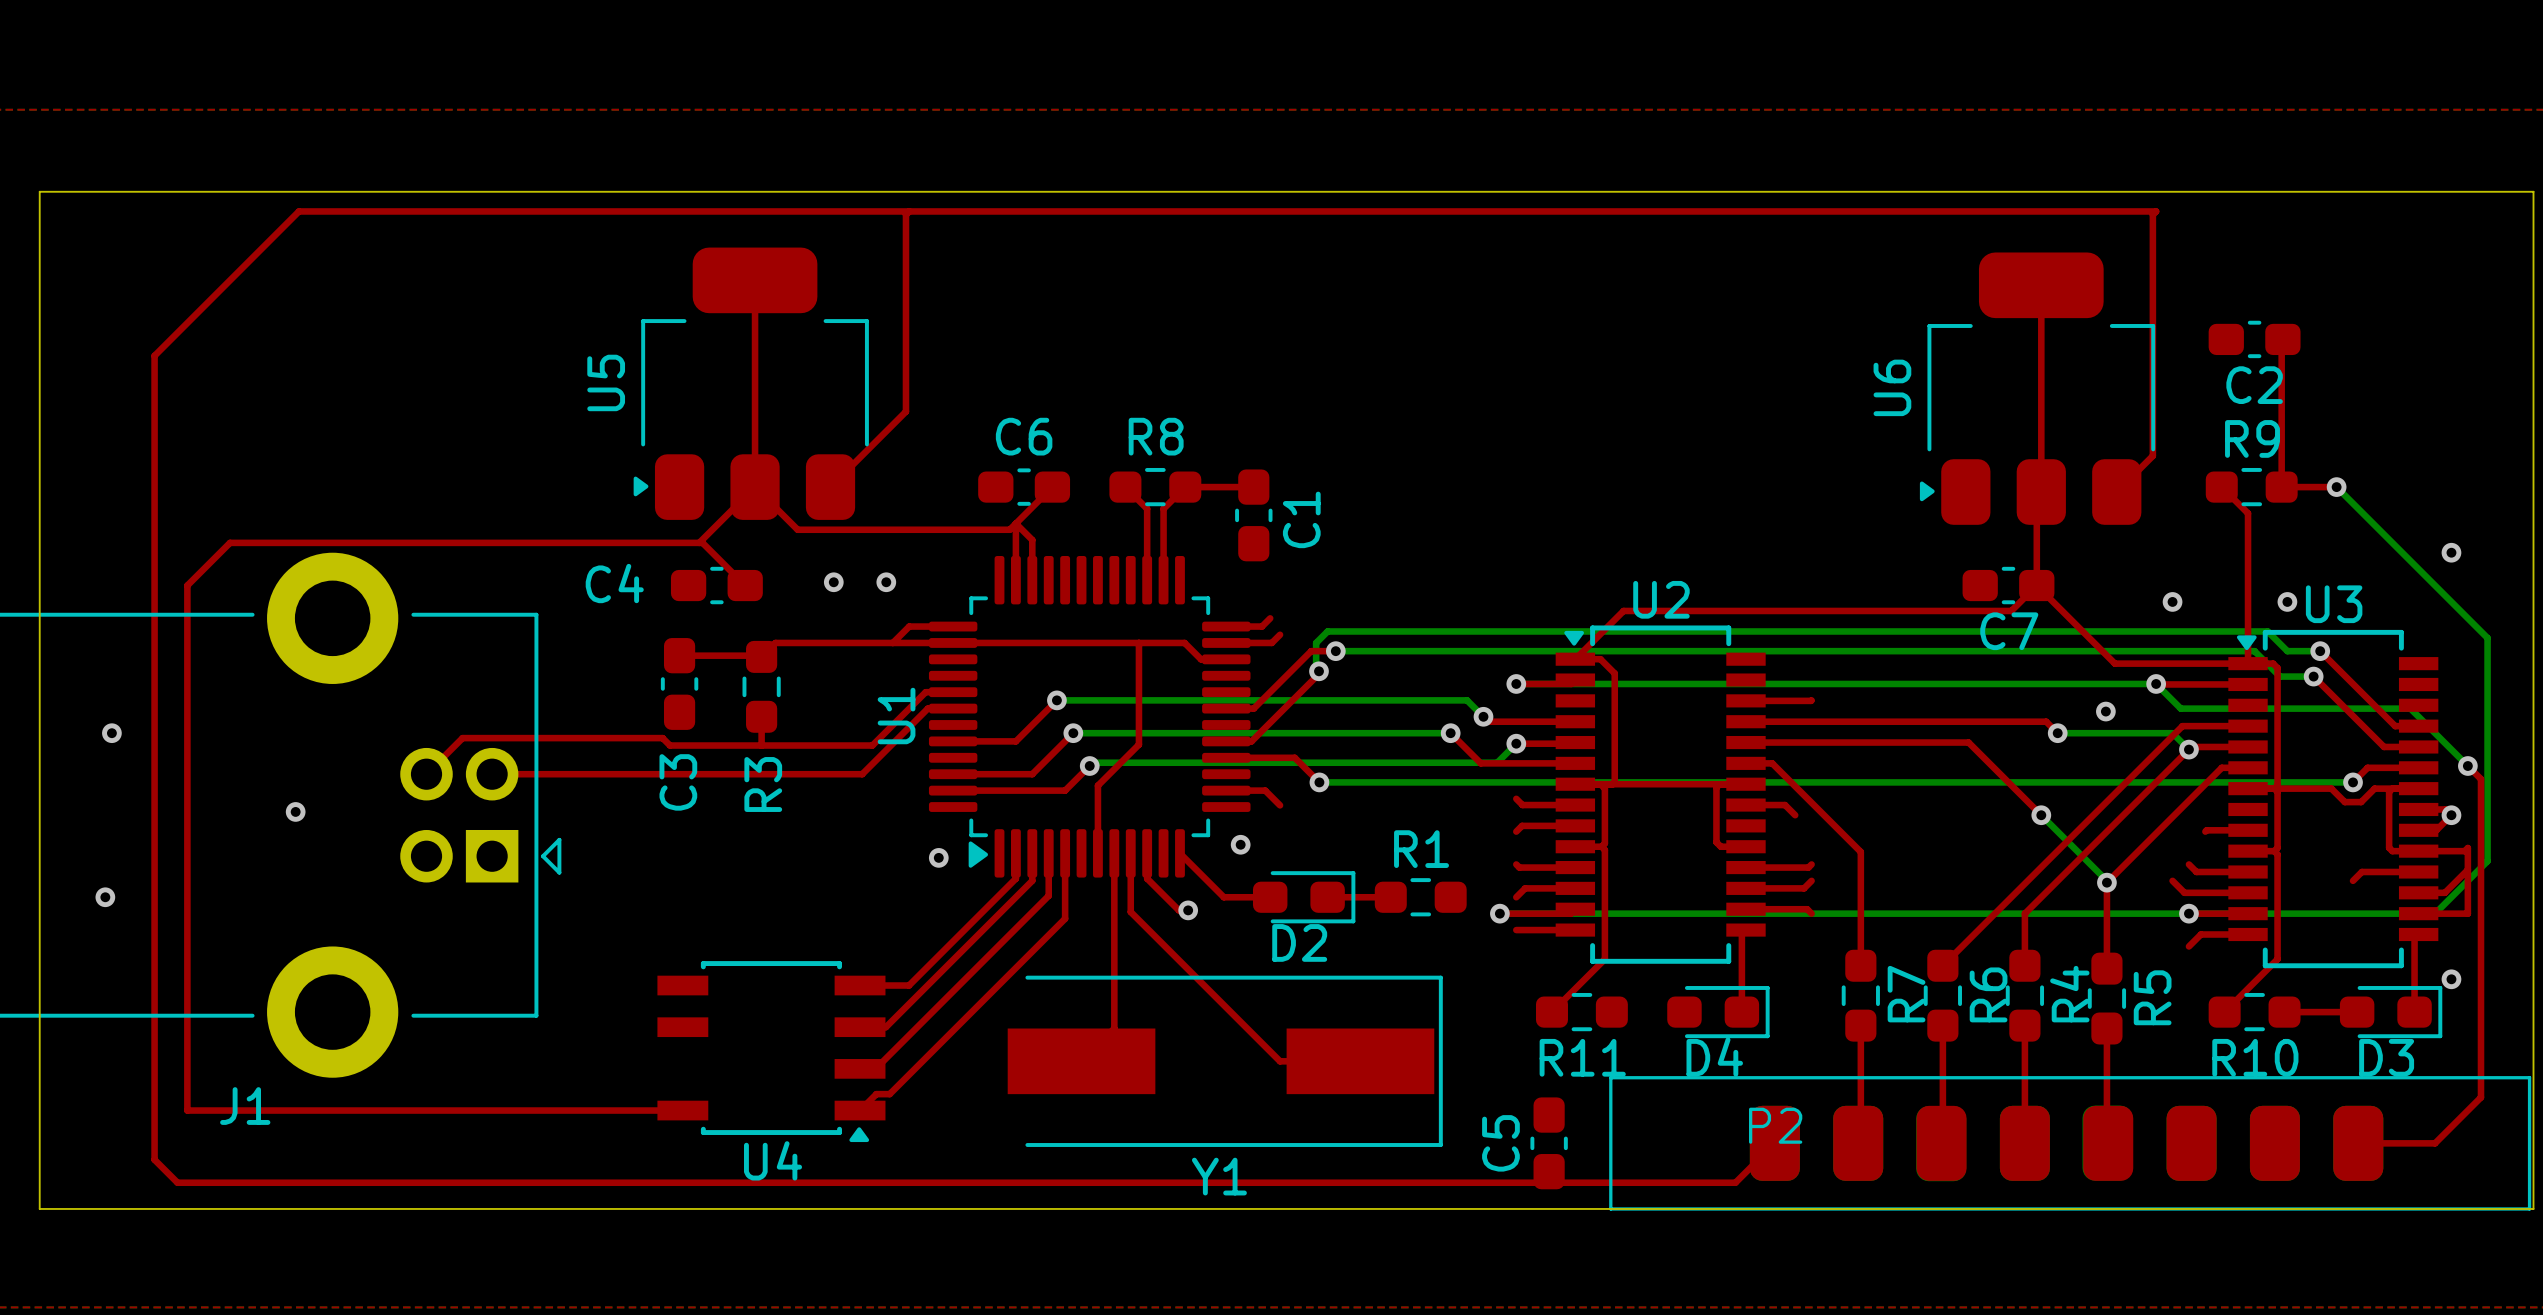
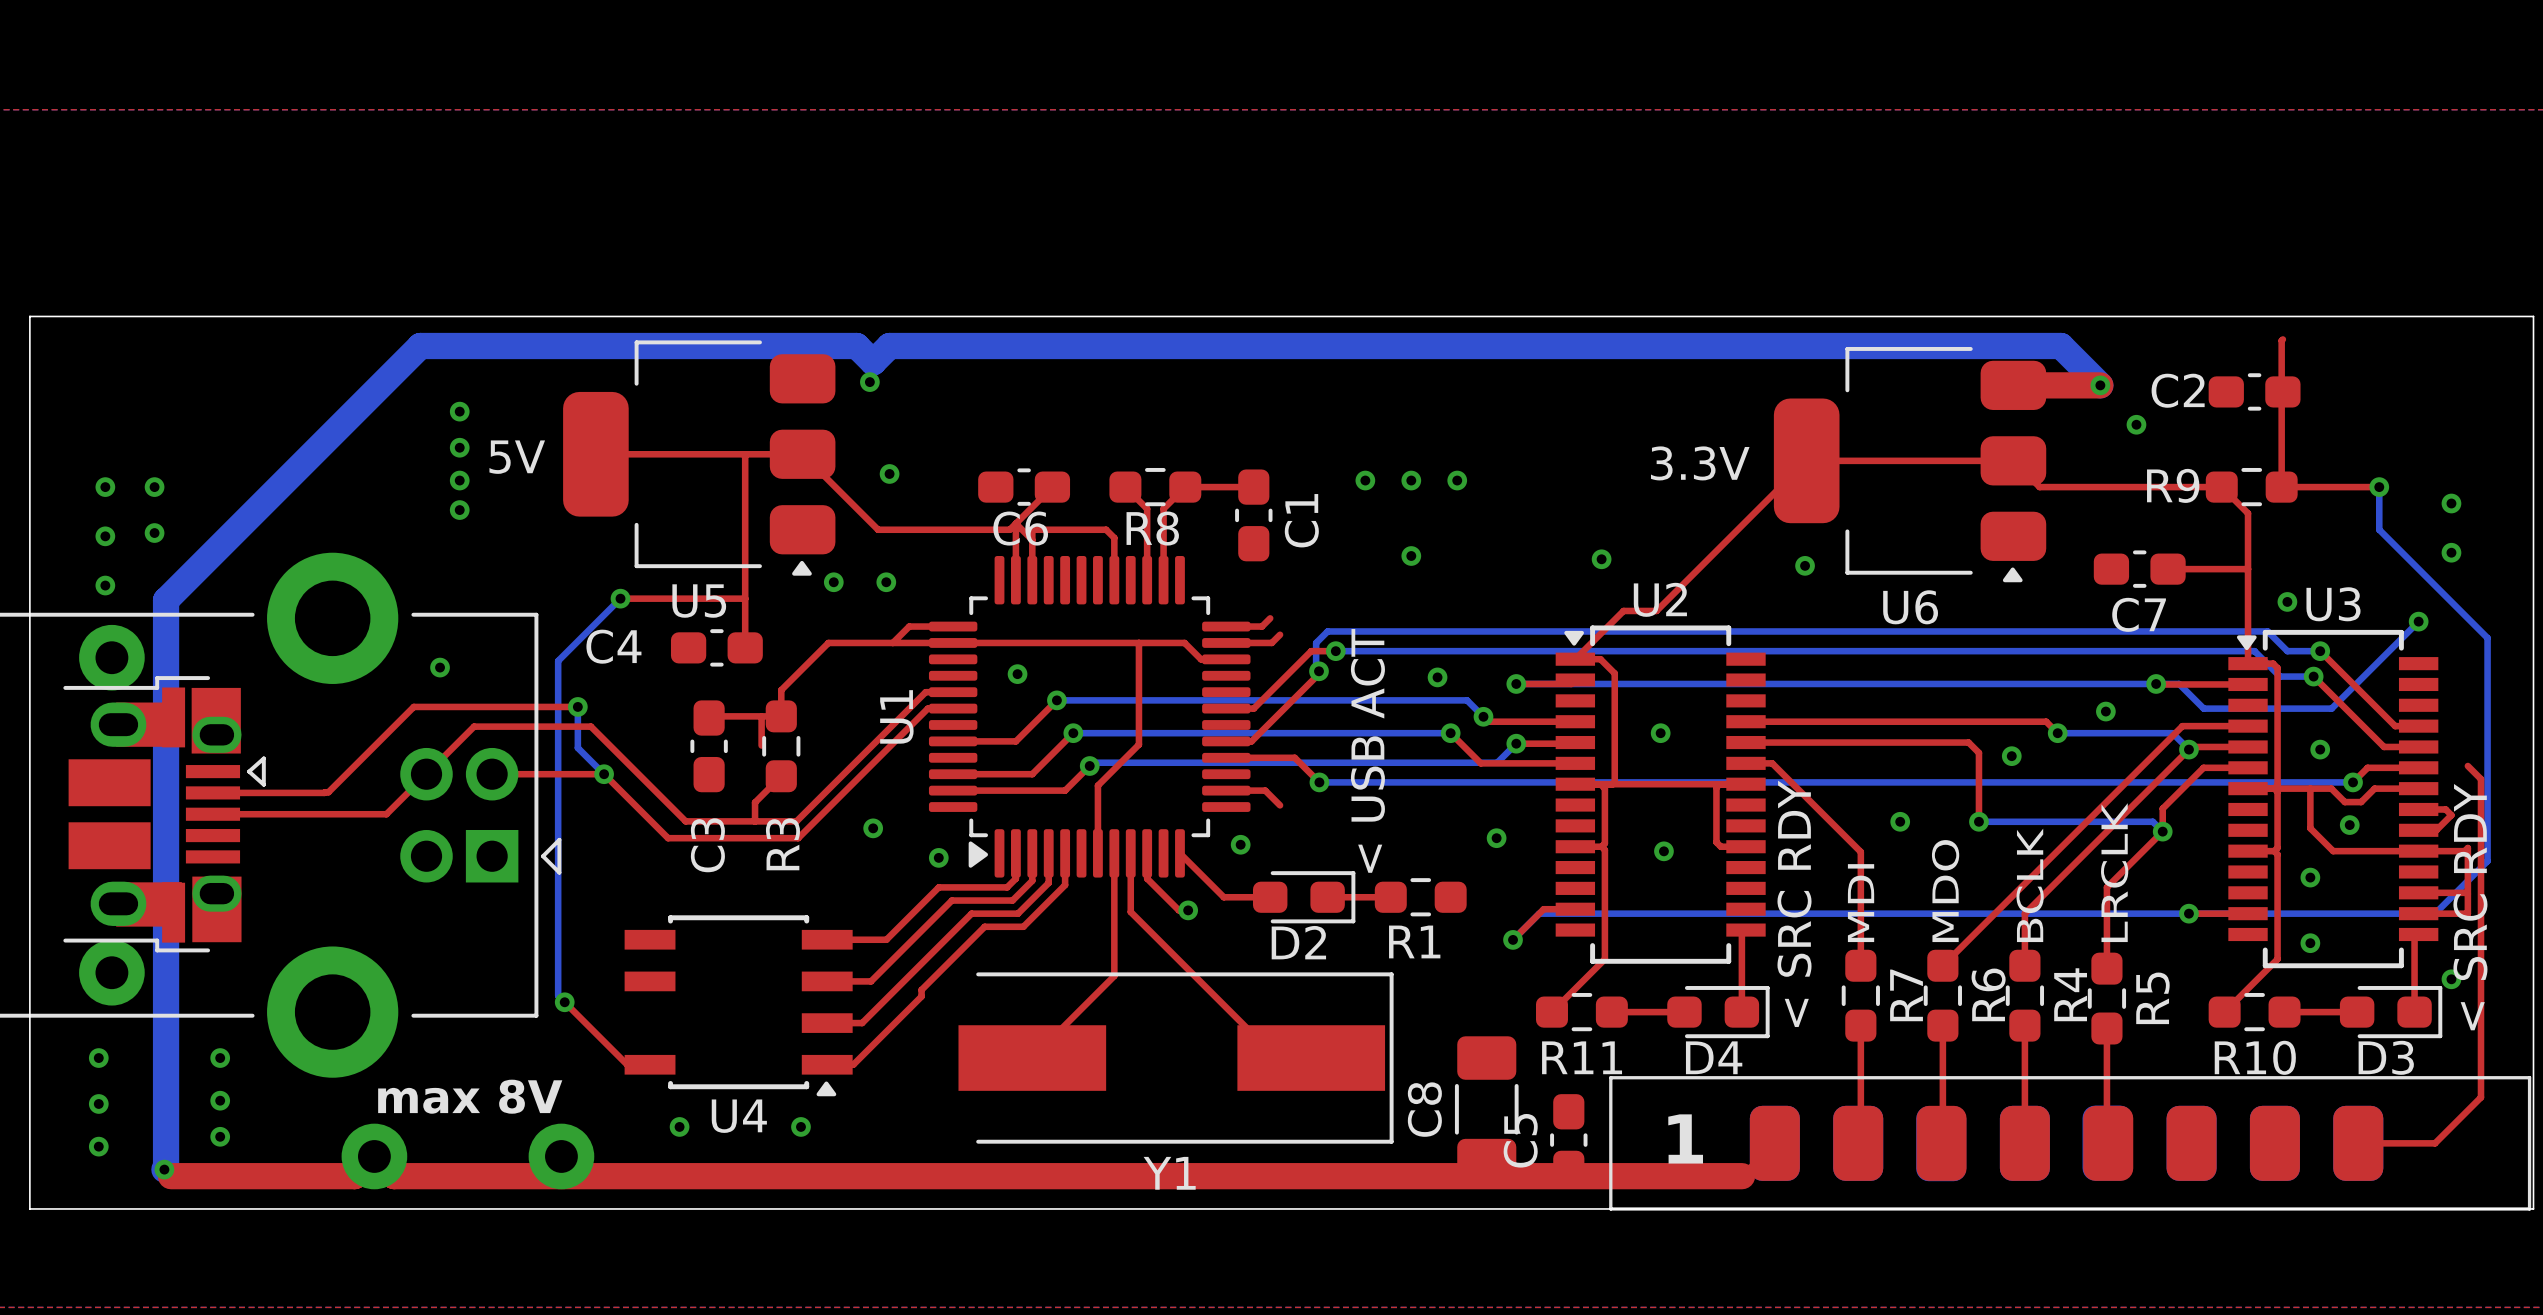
top track: (909, 211) (905, 214) (905, 411) (830, 487) -> none
top track: (755, 280) (755, 487) -> none
top track: (2041, 285) (2041, 492) (2036, 496) (2036, 585) -> none
board edge: (2533, 316) (2533, 191) (39, 191) (39, 1208) -> (2533, 316) (29, 316) (29, 1208) (39, 1208)
C2 position: (2254, 339) -> (2254, 391)
via: none -> (869, 382)
U5 rotation: 0° (751, 383) -> 90° counterclockwise (699, 458)
top track: none -> (2013, 385) (2100, 385)
bottom track: none -> (2100, 385) (2060, 346) (889, 346) (873, 362) (856, 346) (420, 346) (166, 600) (166, 1167) (164, 1169)
via: none -> (2100, 385)
C2 name position: C2 (2254, 385) -> C2 (2178, 390)
U6 rotation: 0° (2037, 388) -> 90° counterclockwise (1910, 464)
via: none -> (459, 411)
via: none -> (2136, 424)
C6 name position: C6 (1024, 436) -> C6 (1020, 528)
R8 name position: R8 (1156, 436) -> R8 (1152, 528)
R9 name position: R9 (2252, 438) -> R9 (2173, 485)
via: none -> (459, 447)
top track: none -> (595, 454) (743, 454) (745, 455)
top track: none -> (745, 455) (745, 647)
text: none -> 5V (517, 457)
text: none -> 3.3V (1700, 463)
via: none -> (889, 473)
via: none -> (459, 480)
via: none -> (1365, 480)
via: none -> (1411, 480)
via: none -> (1457, 480)
via: none -> (105, 487)
via: none -> (154, 487)
top track: (755, 487) (797, 529) (878, 529) -> (745, 455) (746, 454) (802, 454) (878, 529)
top track: (755, 487) (699, 542) -> none
top track: none -> (2336, 487) (2379, 487)
bottom track: (2336, 487) (2379, 529) -> (2379, 487) (2379, 529)
via position: (2336, 487) -> (2379, 487)
top track: (2116, 492) (2152, 455) (2152, 214) (2156, 211) (298, 211) (154, 355) (154, 1159) (164, 1169) -> none
via: none -> (2451, 503)
via: none -> (459, 510)
via: none -> (154, 533)
via: none -> (105, 536)
top track: none -> (1032, 540) (1032, 529) (1106, 529) (1114, 537) (1114, 580)
via: none -> (1411, 556)
via: none -> (1601, 559)
via: none -> (1805, 565)
top track: none -> (2168, 569) (2248, 569)
via: none -> (105, 585)
C4 position: (716, 585) -> (716, 647)
top track: (745, 585) (702, 542) (230, 542) (187, 585) (187, 1110) (682, 1110) -> none
C7 position: (2008, 585) -> (2139, 569)
top track: (2036, 585) (2011, 610) (1656, 610) -> (2221, 487) (2039, 487) (2013, 460) (1806, 460) (1656, 610)
top track: (2036, 585) (2114, 663) (2248, 663) -> none
top track: none -> (620, 598) (745, 598)
bottom track: none -> (620, 598) (558, 661) (558, 995) (564, 1002)
via: none -> (620, 598)
via: (2172, 601) -> none
via: none -> (2418, 621)
top track: (828, 642) (775, 642) (761, 656) (679, 655) -> (828, 642) (781, 690) (781, 716) (710, 716) (709, 718)
via: none -> (111, 657)
via: none -> (440, 667)
via: none -> (1017, 674)
via: none -> (1437, 677)
C3 position: (679, 683) -> (709, 746)
bottom track: (2156, 683) (2180, 708) (2203, 708) -> (2156, 683) (2179, 683) (2203, 708)
R3 position: (761, 686) -> (781, 746)
top track: (1811, 700) (1745, 700) -> none
top track: none -> (577, 706) (413, 706) (328, 792) (212, 792)
bottom track: none -> (577, 706) (577, 747) (604, 774)
via: none -> (577, 706)
bottom track: (2331, 708) (2410, 708) (2467, 766) -> (2331, 708) (2418, 621)
via: (111, 733) -> none
via: none -> (1660, 733)
text: none -> < USB ACT (1367, 750)
top track: (462, 738) (662, 738) (670, 745) (872, 745) -> (462, 738) (474, 726) (590, 726) (685, 821) (796, 821) (872, 745)
via: none -> (2320, 749)
top track: (1978, 752) (2041, 815) -> (1978, 752) (1978, 821)
via: none -> (2011, 756)
via: (2467, 766) -> none
top track: (2221, 767) (2106, 882) (2106, 887) -> (2221, 767) (2203, 767) (2162, 808) (2162, 831) (2106, 887)
top track: none -> (426, 774) (386, 814) (212, 814)
top track: (604, 774) (862, 774) -> (604, 774) (668, 838) (798, 838) (862, 774)
via: none -> (604, 774)
top track: none -> (781, 776) (755, 802) (755, 821)
top track: (2392, 788) (2389, 791) (2389, 847) (2392, 851) -> (2310, 788) (2310, 828) (2333, 851) (2392, 851)
top track: (1516, 798) (1522, 805) (1575, 805) -> none
top track: (1745, 805) (1785, 805) (1795, 815) -> none
via: (295, 811) -> none
part: none -> (164, 814)
bottom track: (2041, 815) (2106, 882) -> none
via: (2041, 815) -> none
via: (2451, 815) -> none
via: none -> (1900, 821)
bottom track: none -> (1978, 821) (2152, 821) (2162, 831)
via: none -> (1978, 821)
top track: (1575, 825) (1522, 825) (1516, 831) -> none
via: none -> (2349, 825)
via: none -> (873, 828)
top track: (2248, 830) (2205, 831) -> none
via: none -> (2162, 831)
via: none -> (1496, 838)
R1 name position: R1 (1421, 849) -> R1 (1414, 941)
via: none -> (1663, 851)
top track: (1516, 864) (1519, 867) (1575, 867) -> none
top track: (1811, 864) (1808, 867) (1745, 867) -> none
top track: (2188, 864) (2196, 871) (2248, 871) -> none
text: none -> LRCLK (2114, 872)
top track: (2467, 869) (2444, 892) -> (2467, 893) (2444, 892)
top track: (2418, 871) (2361, 871) (2353, 880) -> none
via: none -> (2310, 877)
top track: (1811, 880) (1804, 888) (1745, 888) -> none
top track: (2172, 880) (2184, 892) (2248, 892) -> none
text: none -> BCLK (2030, 885)
top track: (1048, 882) (1048, 895) (875, 1068) (860, 1068) -> (1048, 882) (1018, 913) (971, 913) (862, 1023) (827, 1023)
via: (2106, 882) -> none
top track: (1065, 885) (1065, 918) (889, 1094) (876, 1094) (860, 1110) -> (1065, 885) (1023, 926) (984, 926) (921, 989) (921, 996) (853, 1064) (827, 1064)
text: none -> < SRC RDY (1794, 903)
top track: (1007, 887) (909, 985) (860, 985) -> (1007, 887) (938, 887) (886, 939) (827, 939)
top track: (1575, 888) (1525, 888) (1516, 897) -> none
text: none -> < SRC RDY (2470, 907)
text: none -> MDO (1945, 891)
via: (105, 897) -> none
top track: (1012, 900) (885, 1027) (860, 1027) -> (1012, 900) (951, 900) (871, 981) (827, 981)
text: none -> MDI (1861, 903)
top track: (1575, 909) (1570, 913) (1499, 913) -> (1575, 909) (1543, 909) (1513, 939)
top track: (1745, 909) (1807, 909) (1811, 913) -> none
via position: (1499, 913) -> (1513, 939)
top track: (1516, 930) (1575, 930) -> none
top track: (2248, 934) (2200, 934) (2188, 946) -> none
via: none -> (2310, 943)
via: none -> (111, 972)
top track: (1114, 976) (1114, 1028) (1081, 1061) -> (1114, 976) (1032, 1058)
top track: none -> (564, 1002) (627, 1064) (650, 1064)
via: none -> (564, 1002)
top track: none -> (1611, 1012) (1684, 1012)
U4 position: (771, 1051) -> (738, 1005)
via: none -> (98, 1058)
via: none -> (220, 1058)
Y1 position: (1225, 1061) -> (1176, 1058)
text: none -> max 8V (470, 1096)
via: none -> (220, 1100)
via: none -> (98, 1103)
J1 name: J1 (245, 1106) -> none
C8: none -> (1486, 1109)
P2 name: P2 (1775, 1125) -> none
via: none -> (679, 1126)
via: none -> (800, 1126)
via: none -> (220, 1136)
text: none -> 1 (1685, 1138)
C5 position: (1549, 1143) -> (1568, 1140)
via: none -> (98, 1146)
via: none -> (374, 1156)
via: none -> (561, 1156)
via: none -> (164, 1169)
top track: (170, 1176) (177, 1182) (1735, 1182) (1742, 1176) -> (170, 1176) (354, 1176) (374, 1156) (394, 1176) (1742, 1176)

